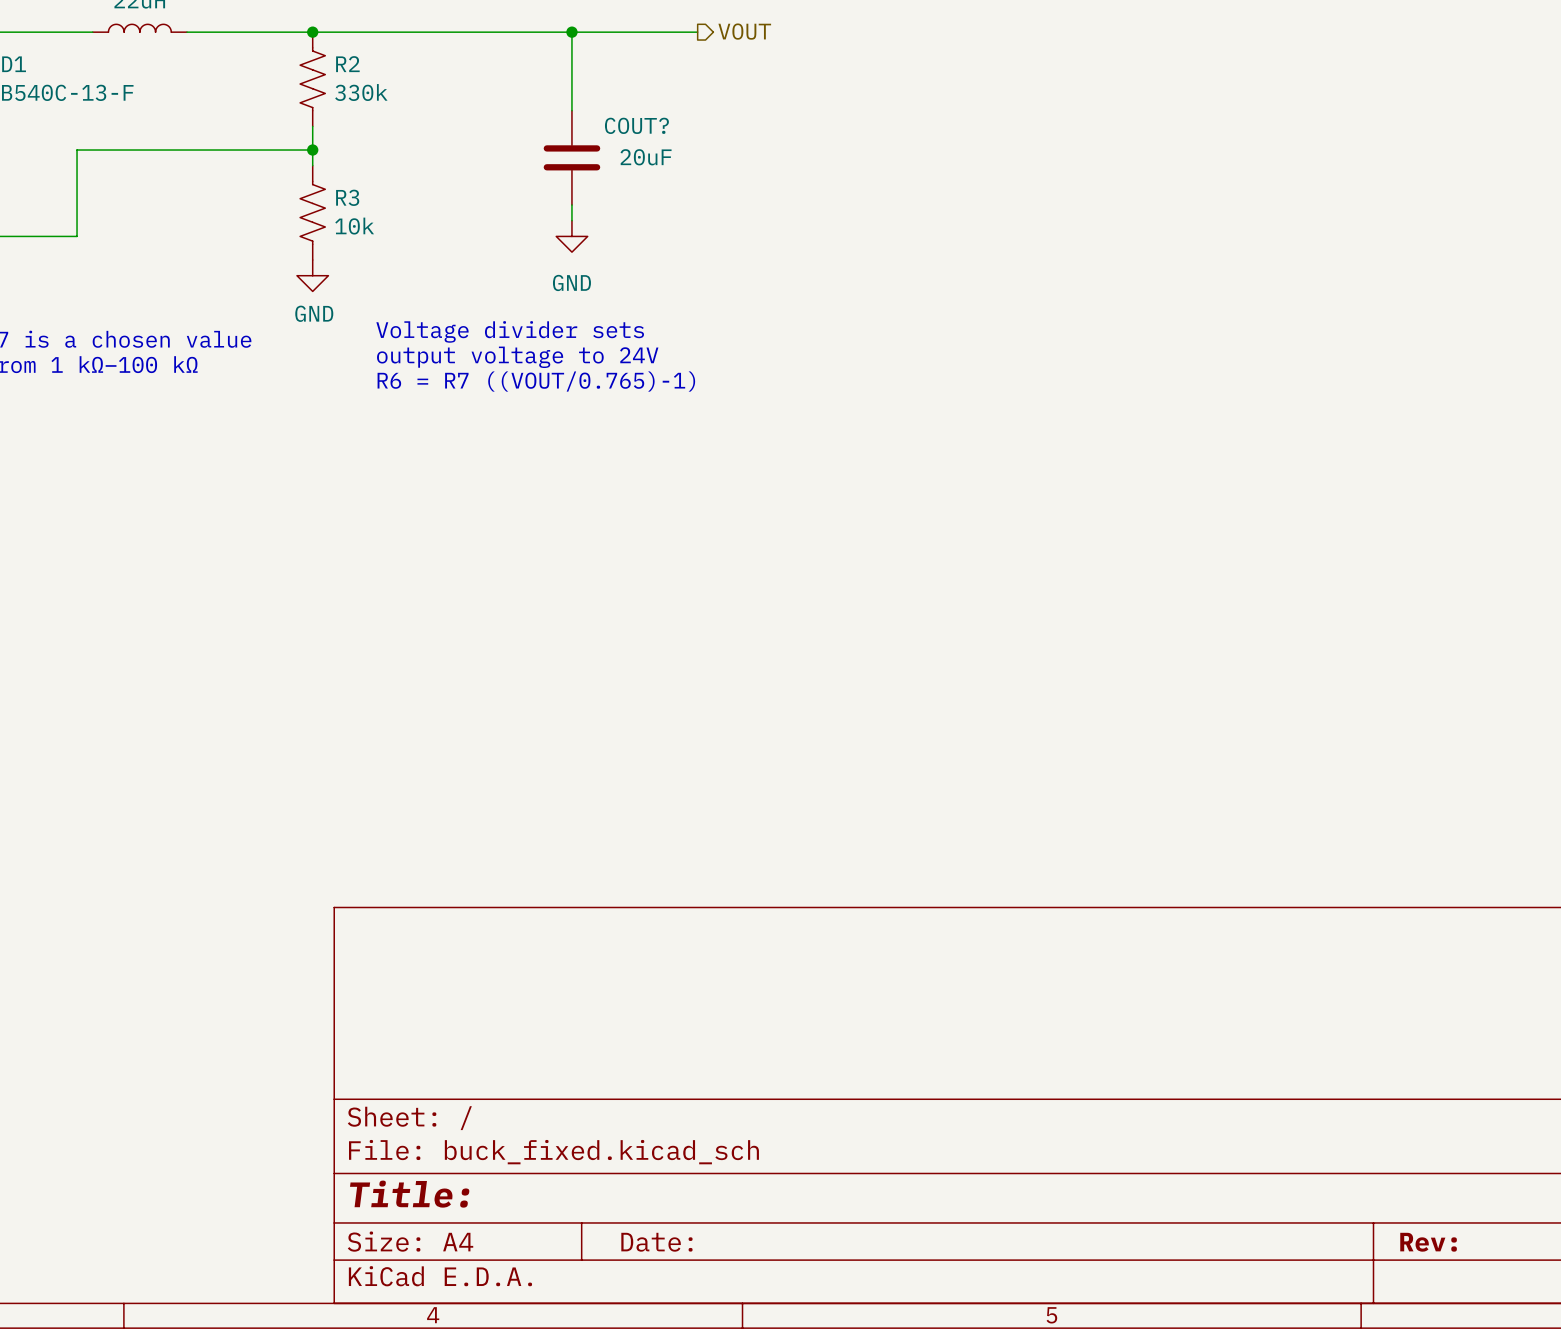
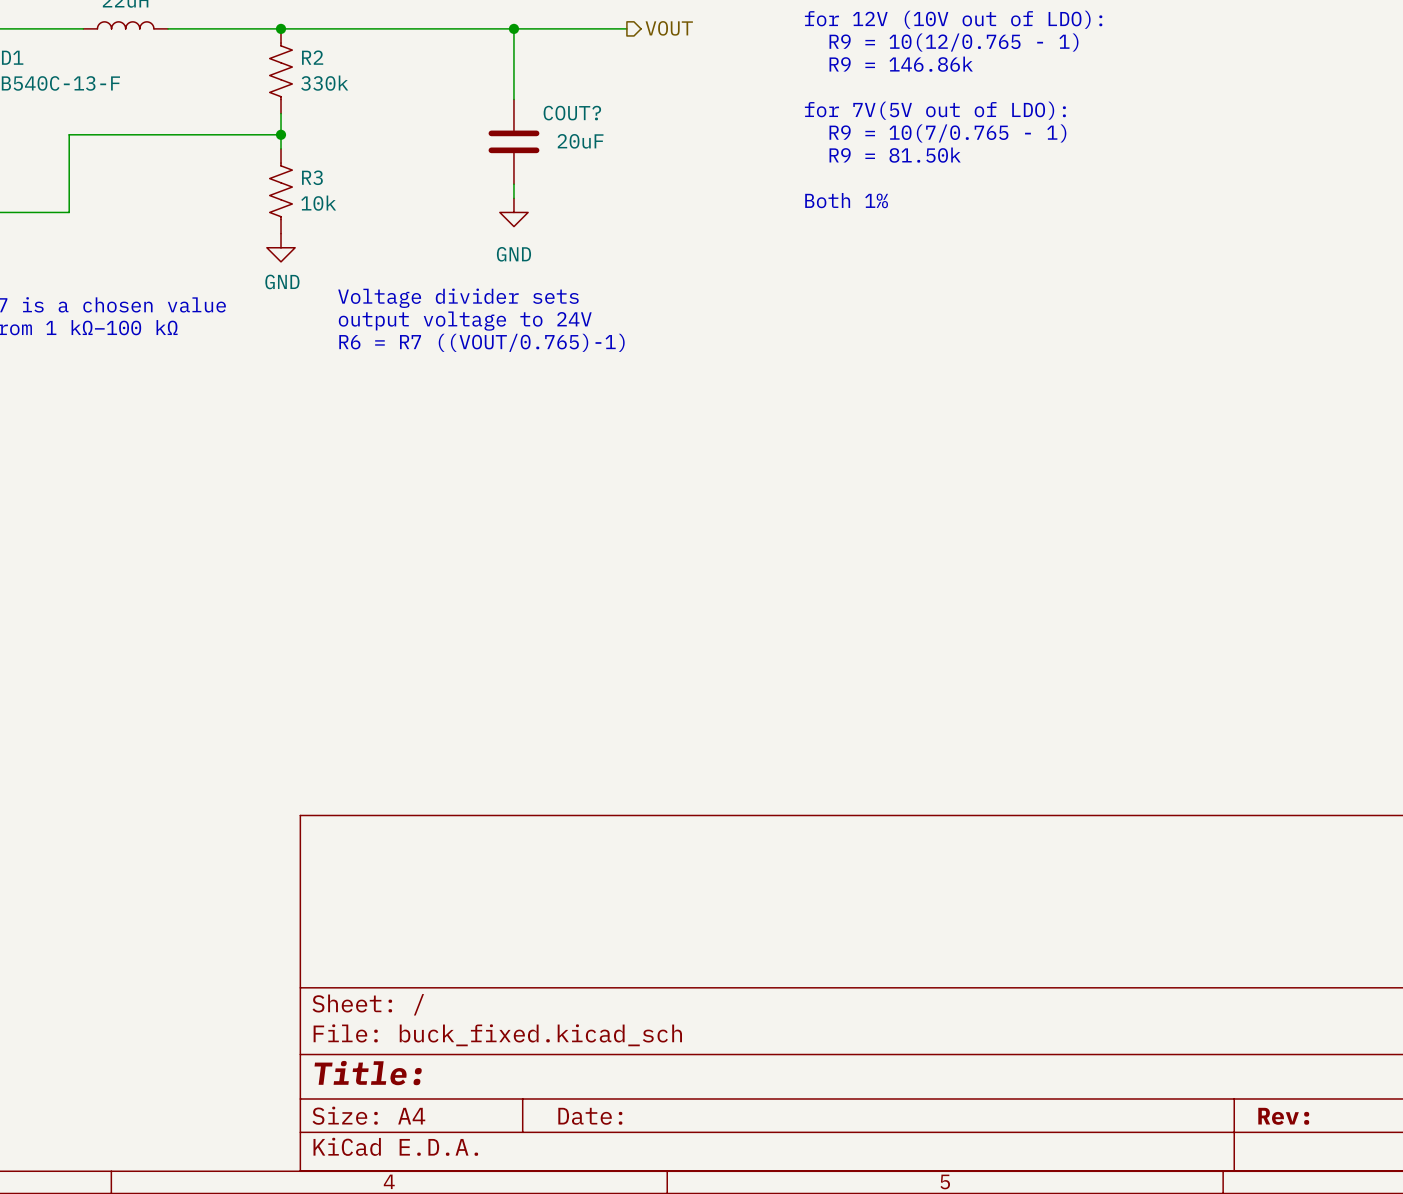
text: none -> for 12V (10V out of LDO): (953, 19)
text: none -> R9 = 10(12/0.765 - 1) (953, 42)
text: none -> R9 = 146.86k (901, 64)
text: none -> for 7V(5V out of LDO): (935, 110)
text: none -> R9 = 10(7/0.765 - 1) (947, 133)
text: none -> R9 = 81.50k (895, 155)
text: none -> Both 1% (846, 200)

